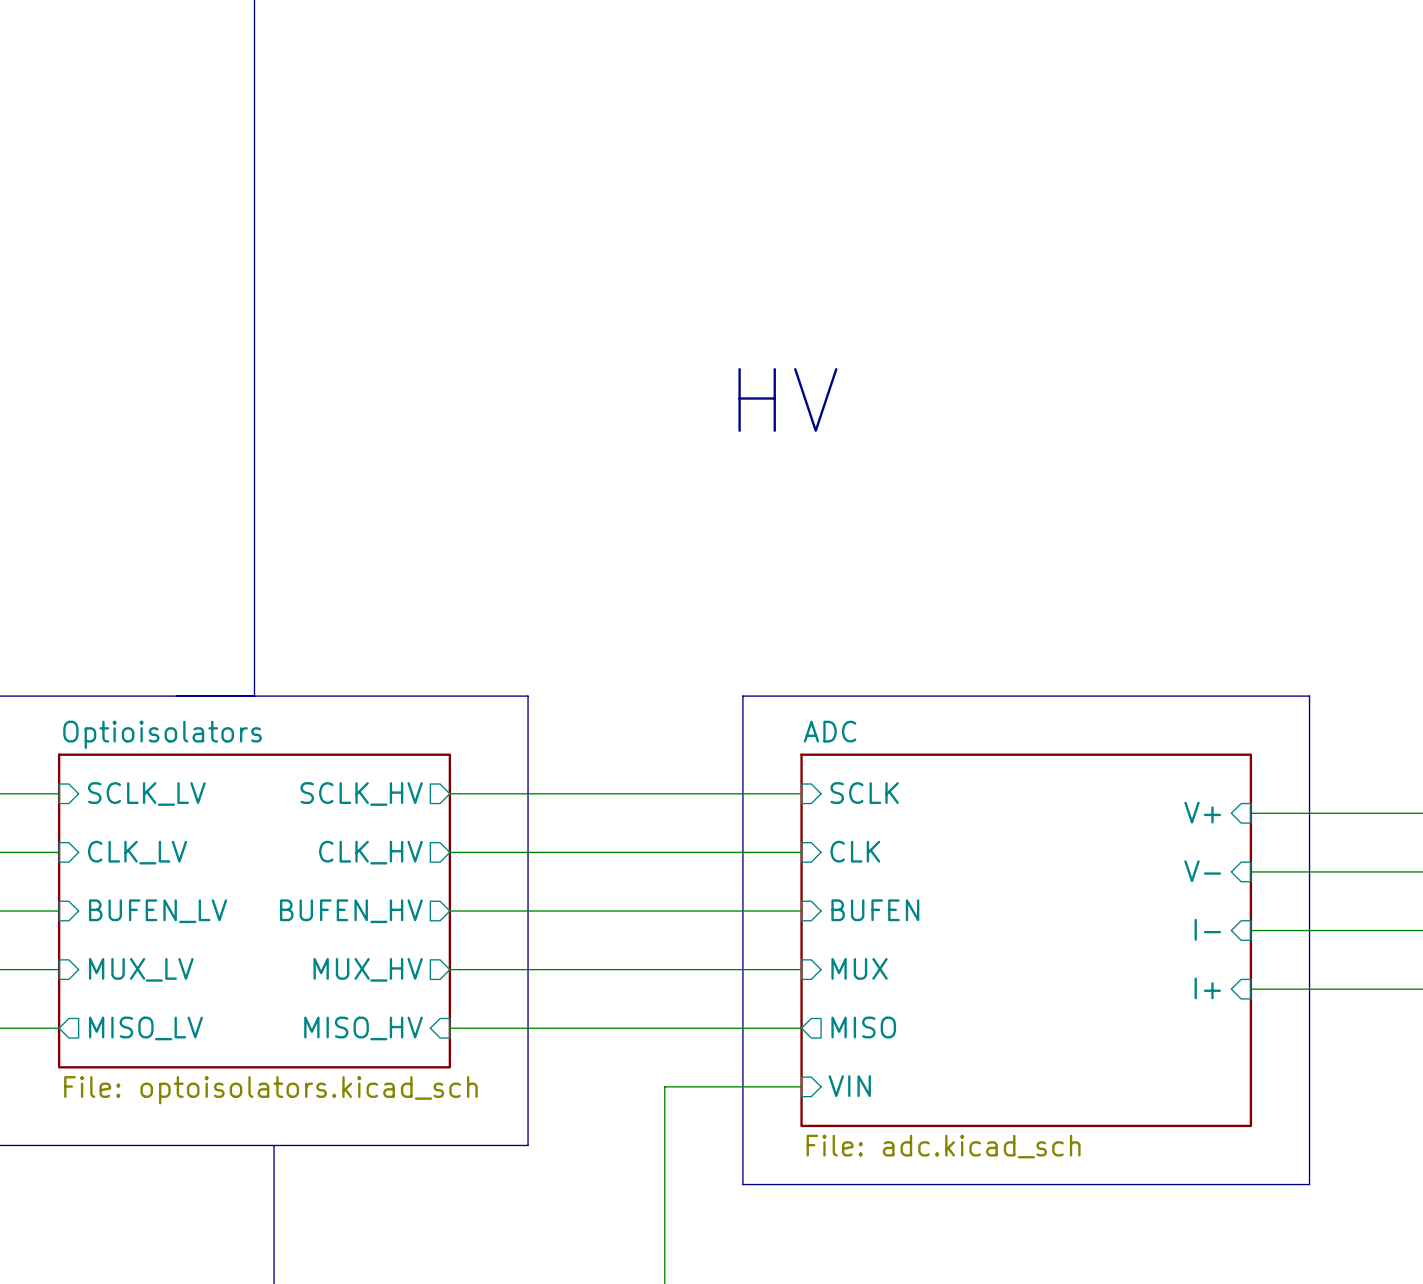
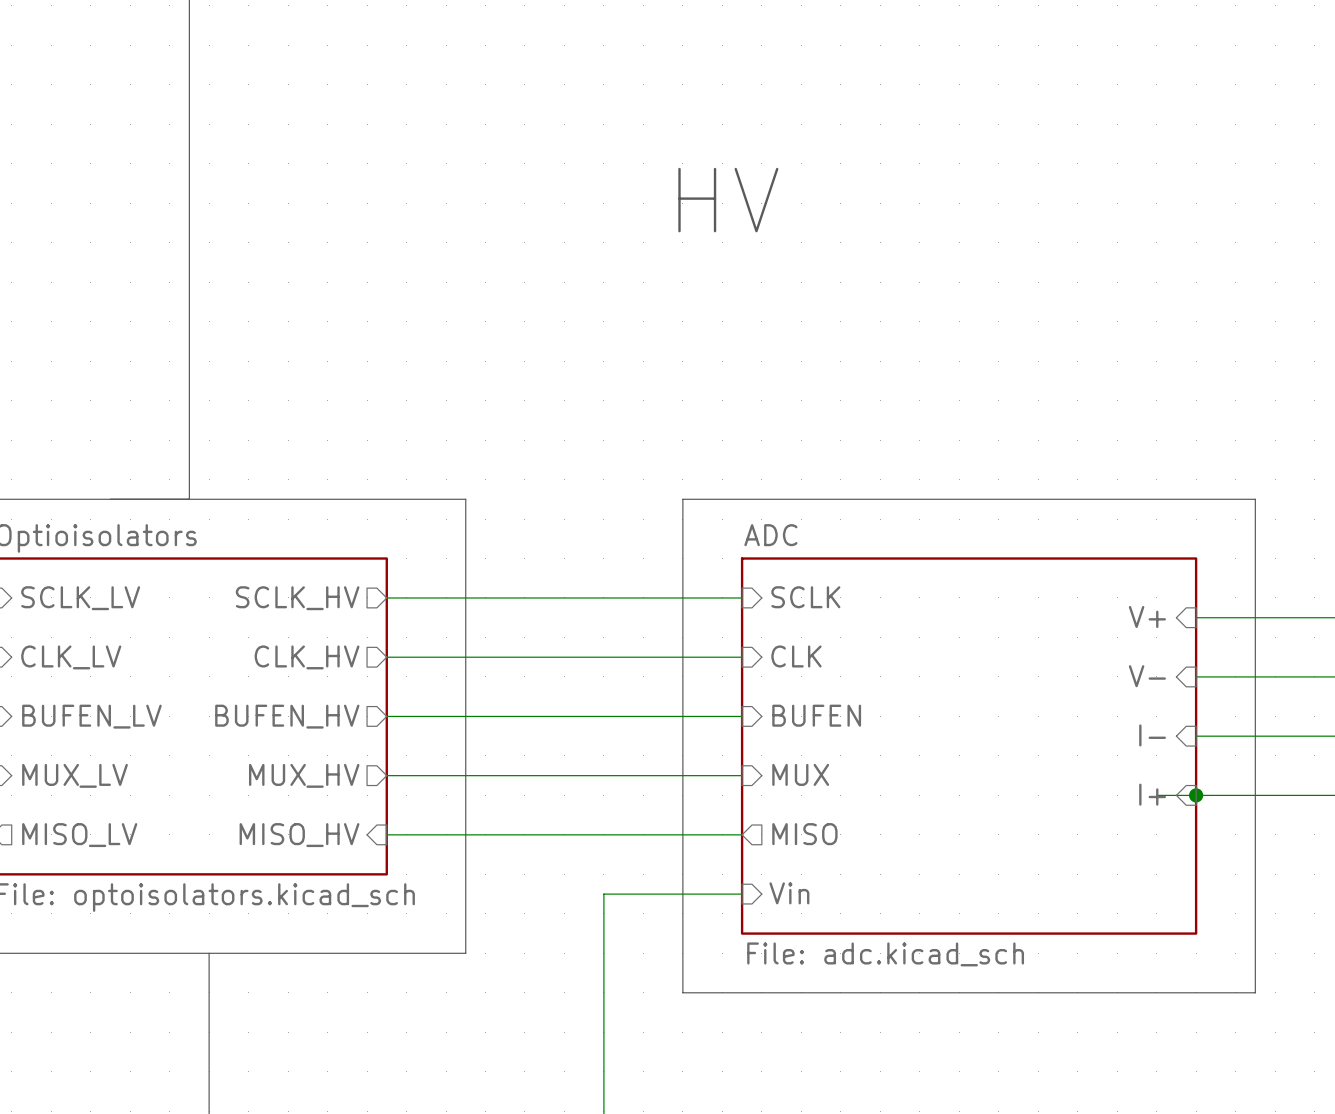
wire: none -> (1156, 795) (1196, 795)
junction: none -> (1196, 795)
sheet pin: VIN (849, 1086) -> Vin (789, 893)

